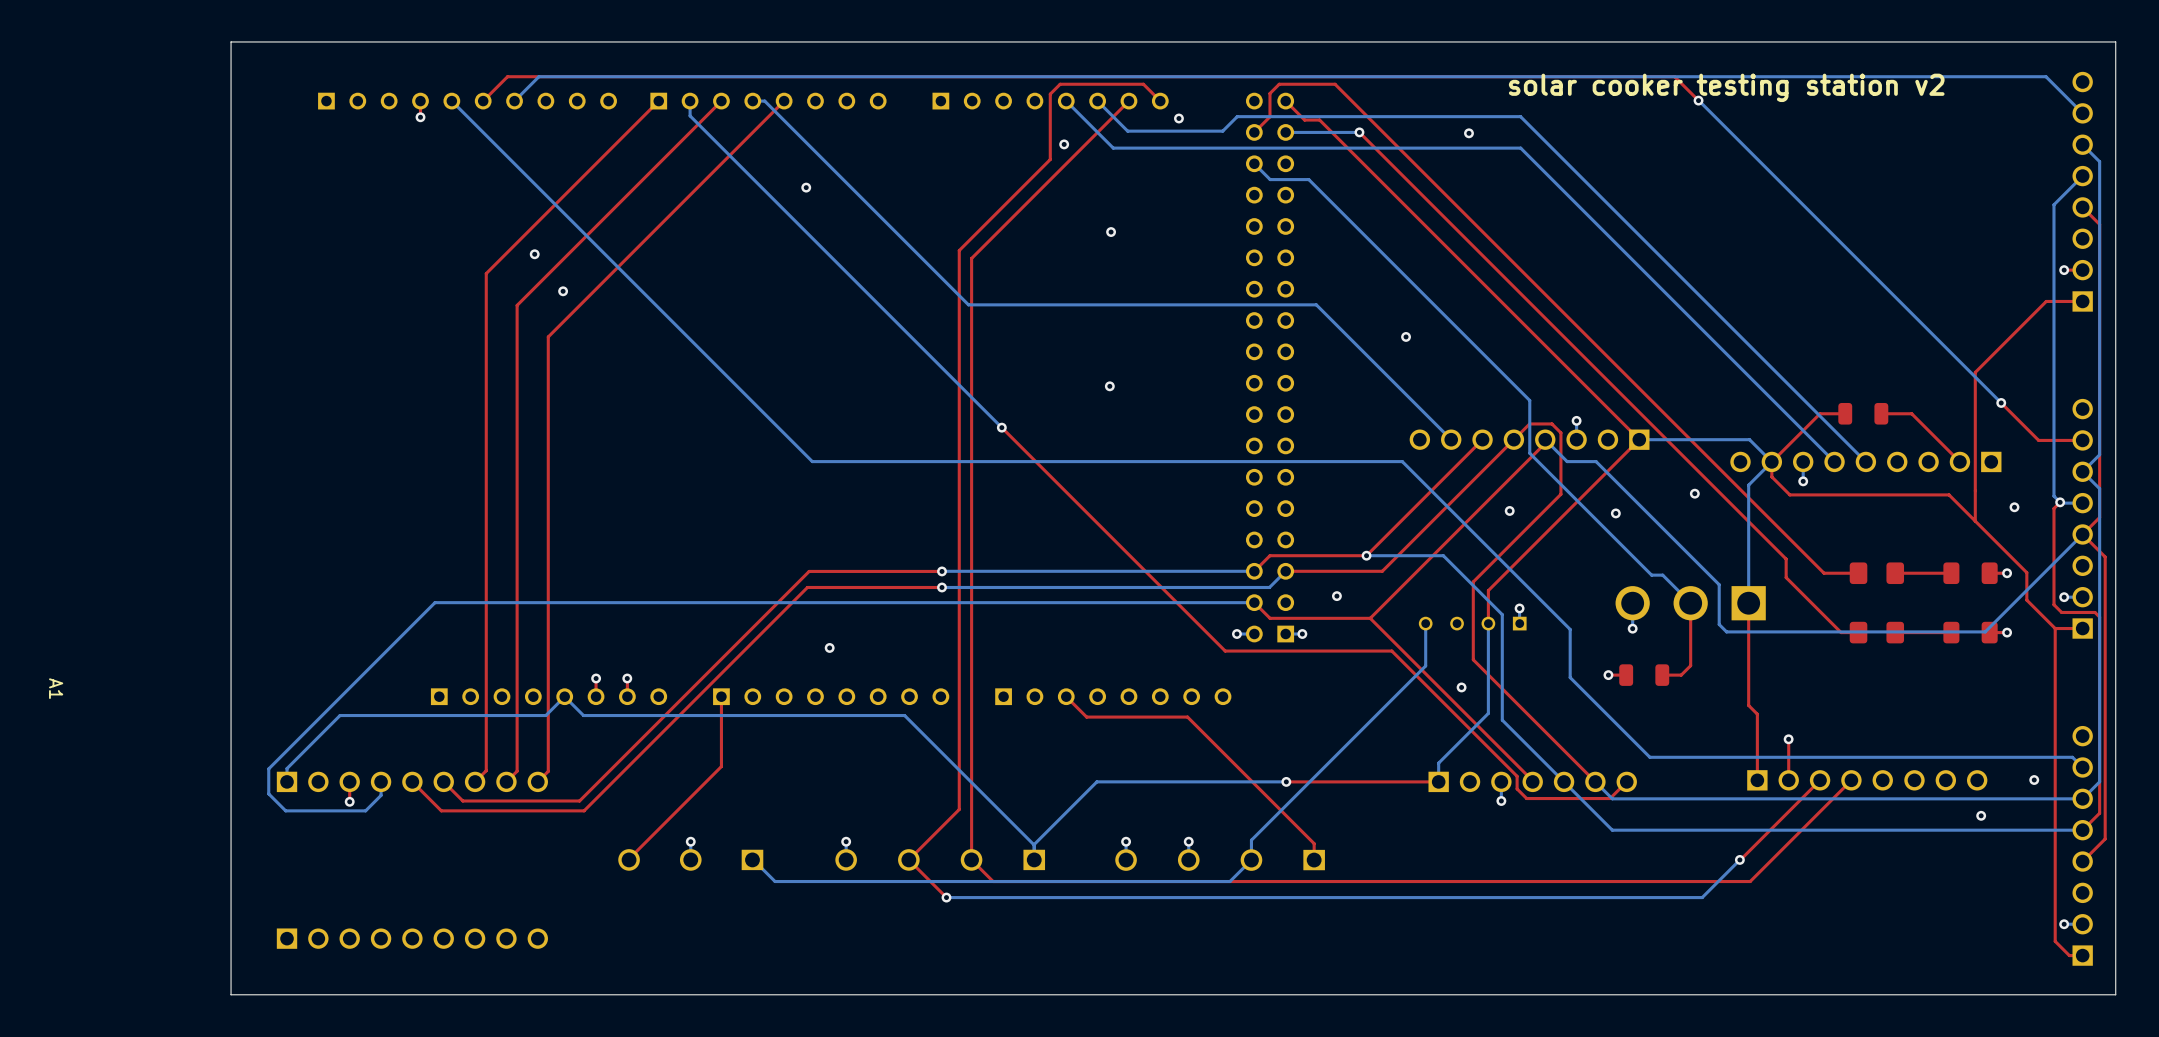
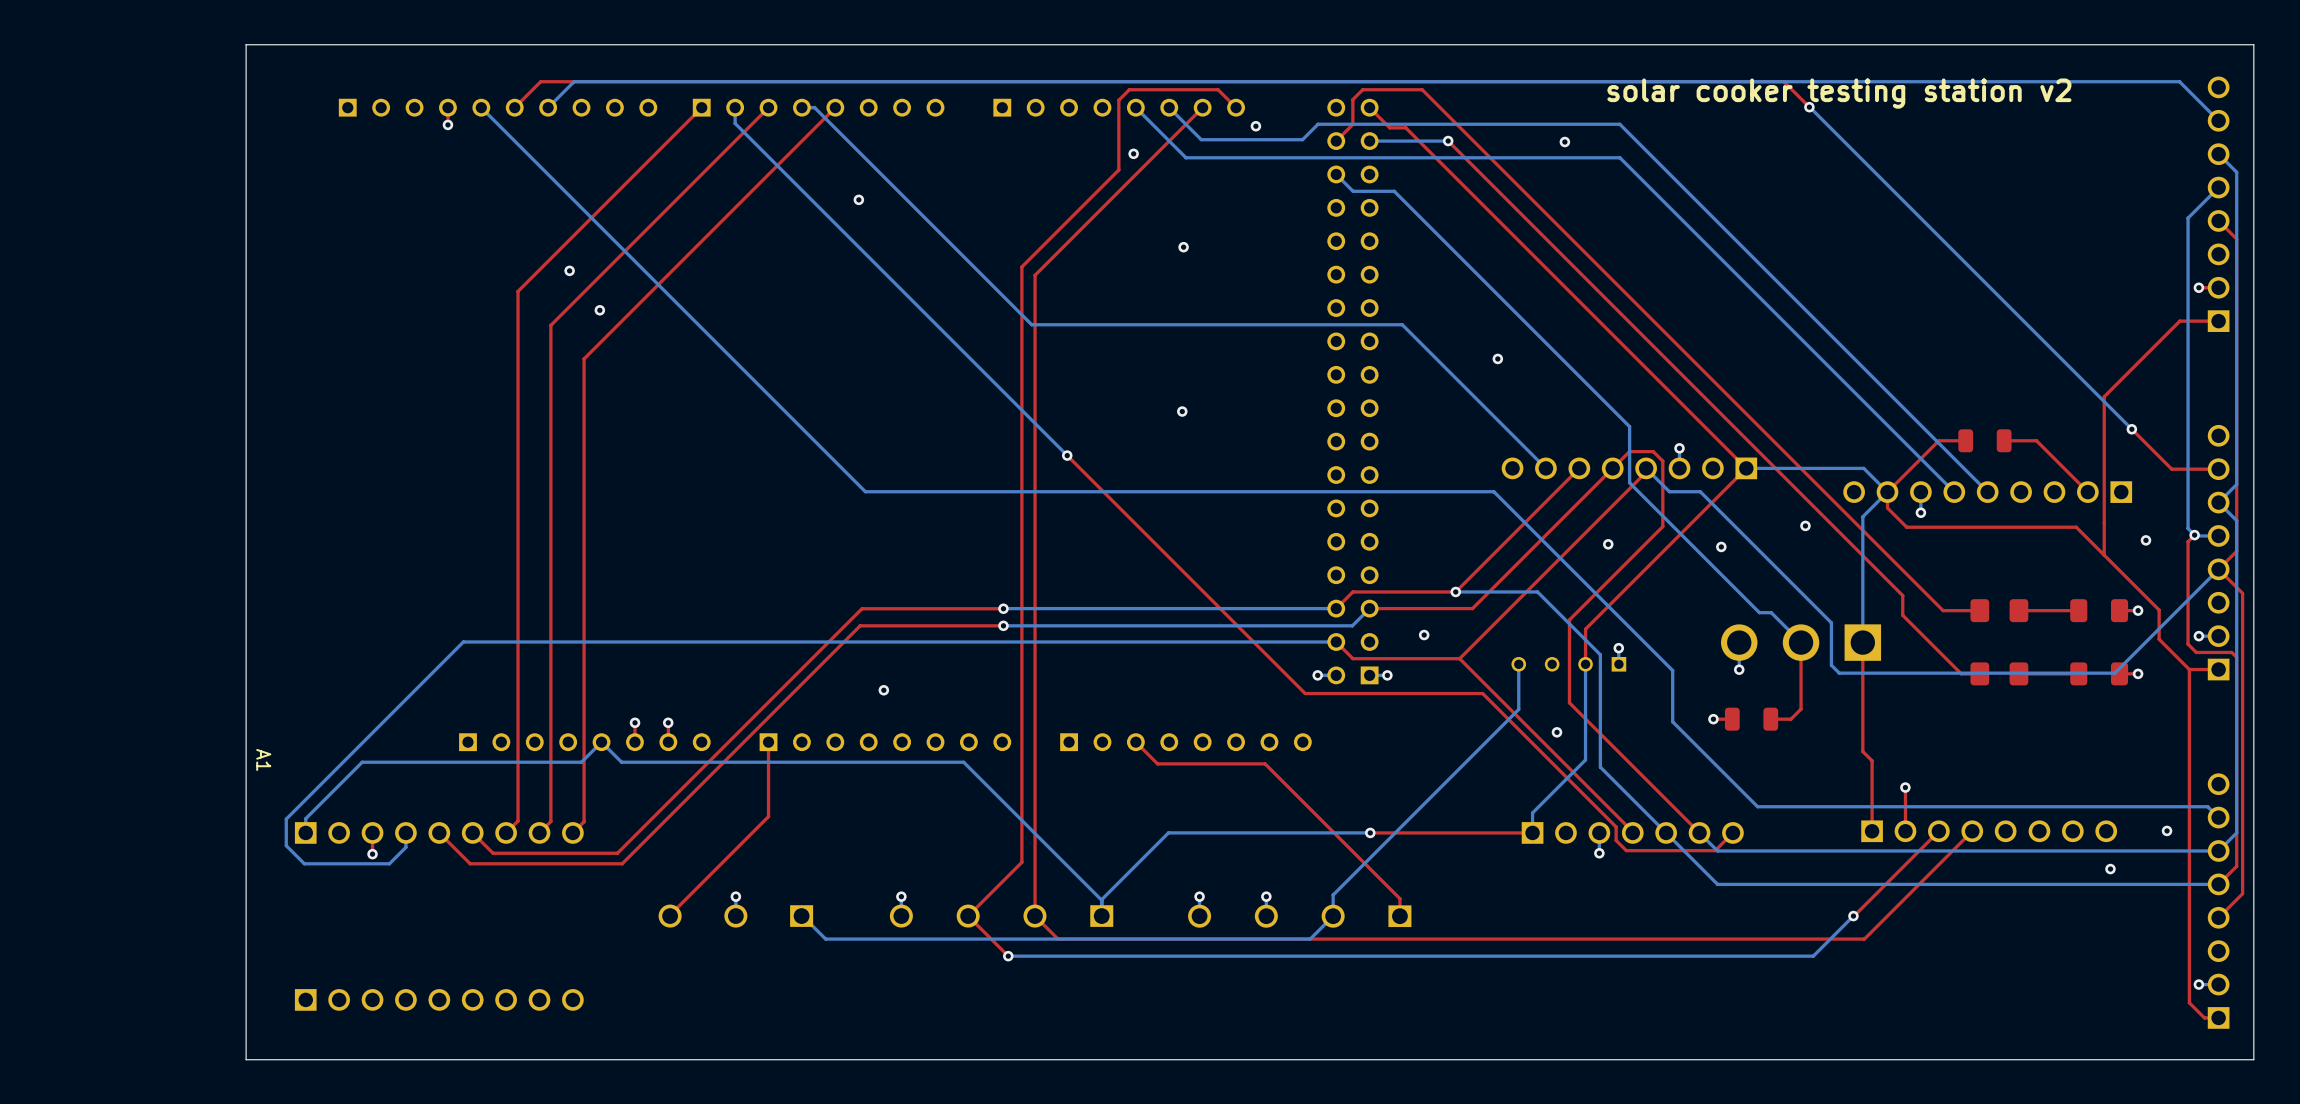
A1 name position: A1 (56, 688) -> A1 (263, 759)

